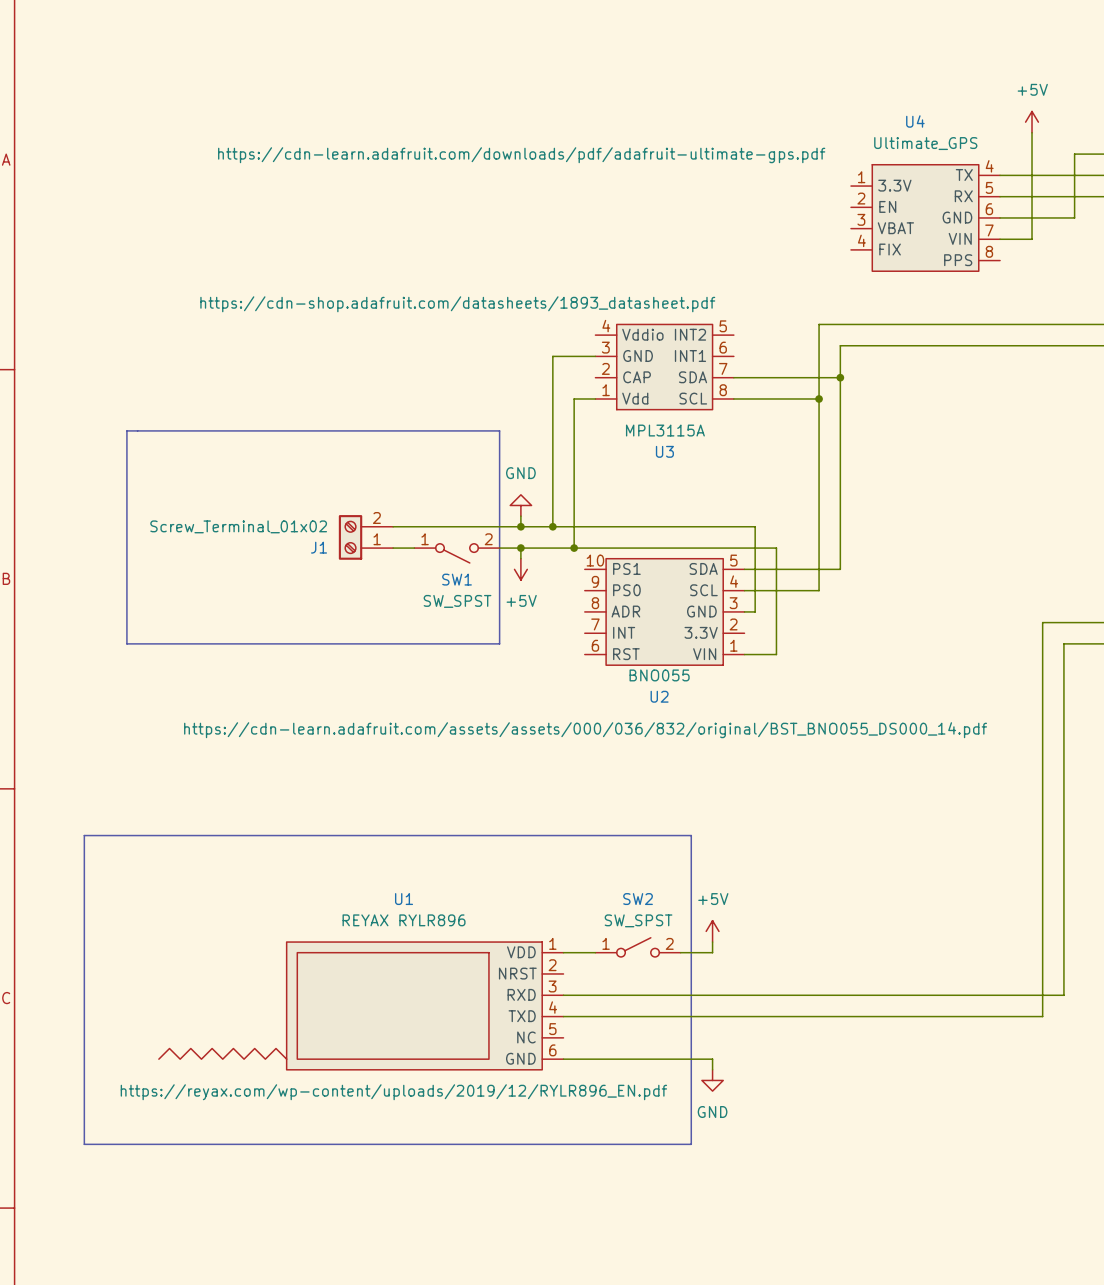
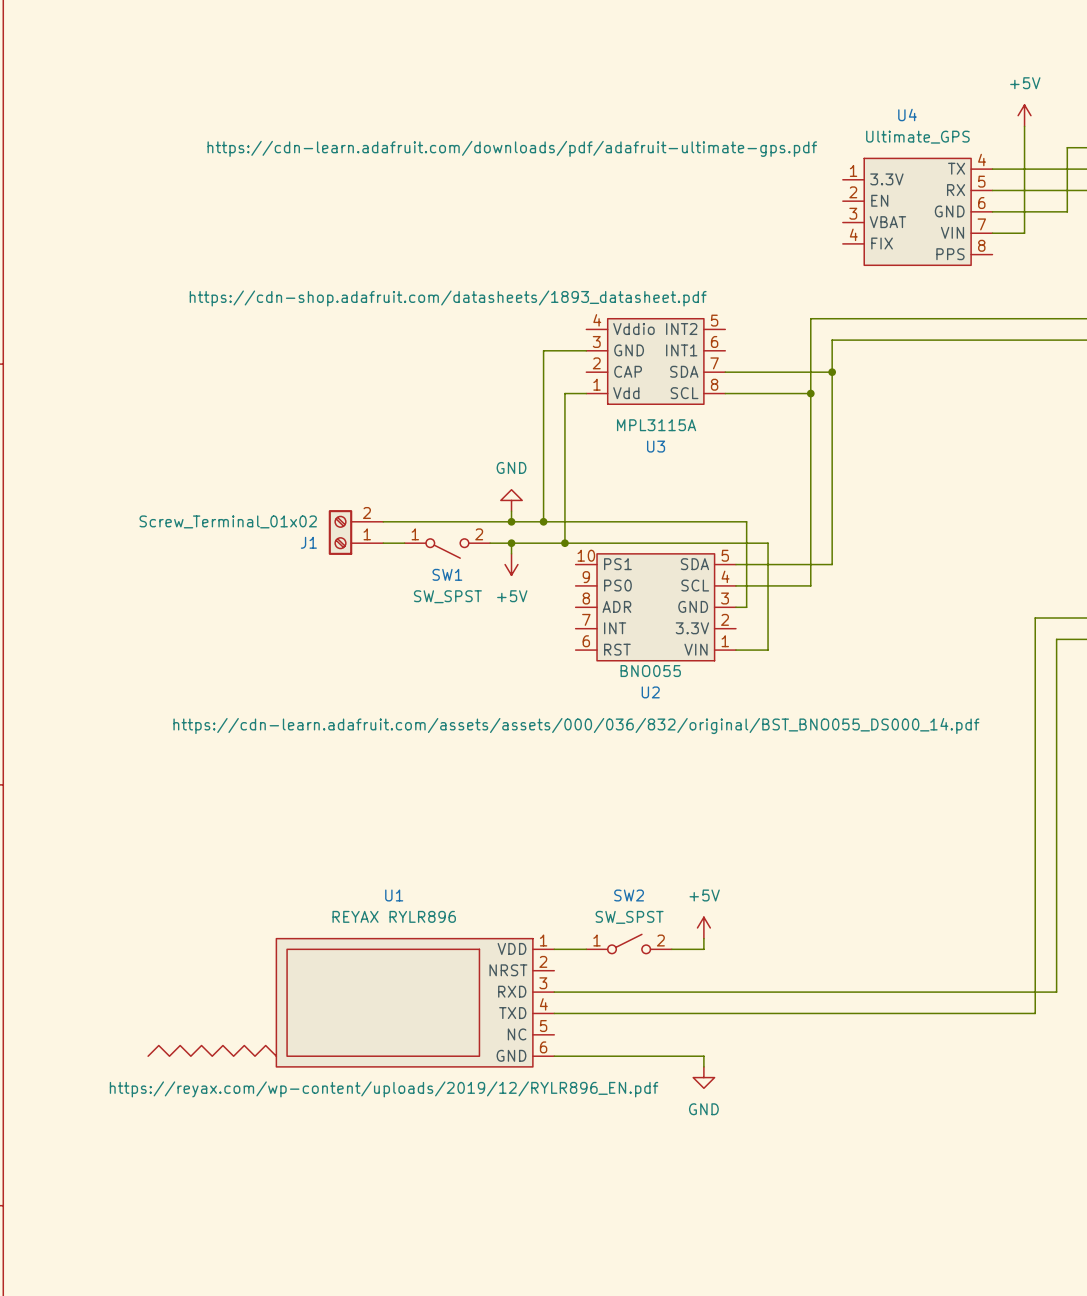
line: (126, 430) (126, 643) (499, 643) (499, 430) (126, 430) -> none
line: (84, 835) (691, 835) (691, 1144) (84, 1144) (84, 835) -> none

